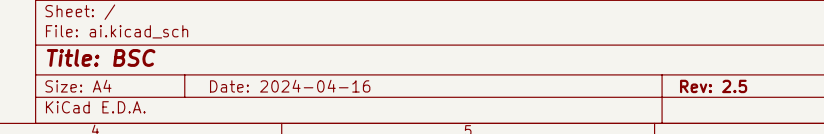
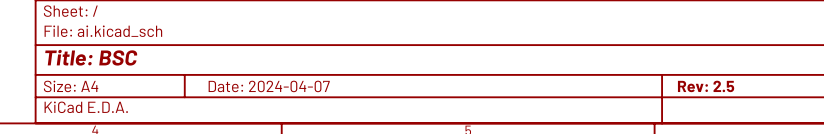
title block: Date: 2024-04-16 (290, 86) -> Date: 2024-04-07 (269, 86)

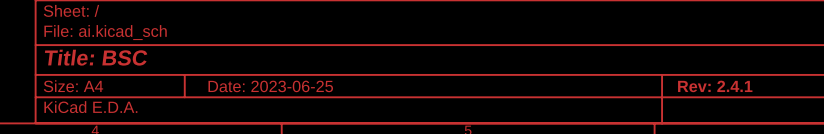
title block: Date: 2024-04-07 (269, 86) -> Date: 2023-06-25 (270, 86)
title block: Rev: 2.5 (706, 86) -> Rev: 2.4.1 (715, 86)

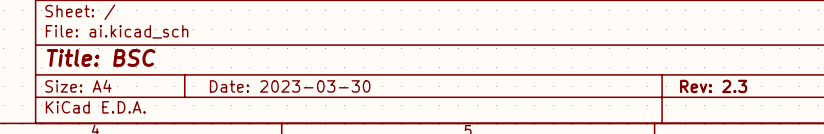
title block: Date: 2023-06-25 (270, 86) -> Date: 2023-03-30 (290, 86)
title block: Rev: 2.4.1 (715, 86) -> Rev: 2.3 (713, 86)

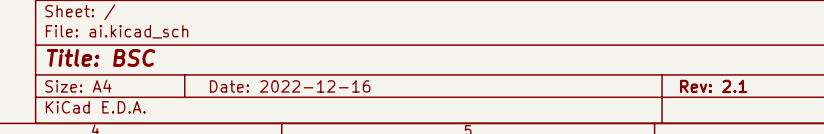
title block: Date: 2023-03-30 (290, 86) -> Date: 2022-12-16 (290, 86)
title block: Rev: 2.3 (713, 86) -> Rev: 2.1 (713, 86)

